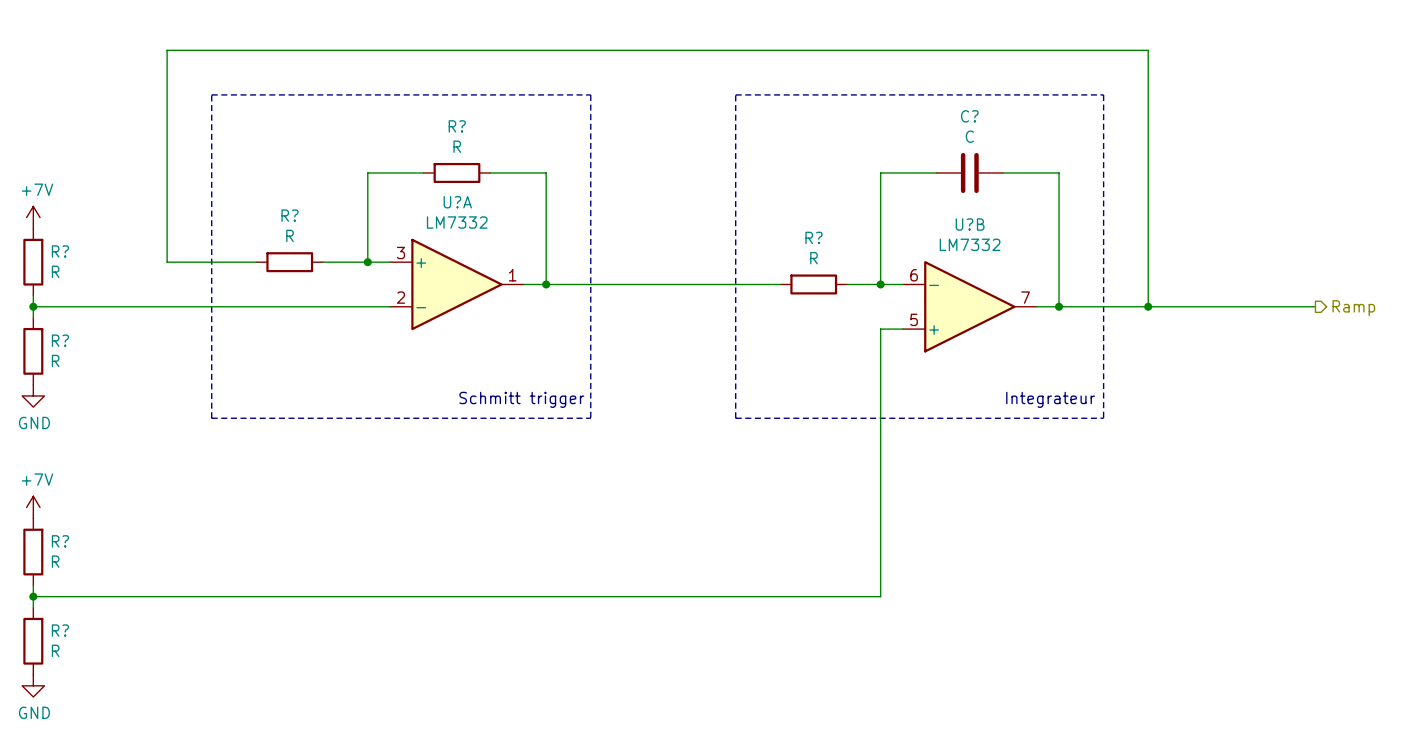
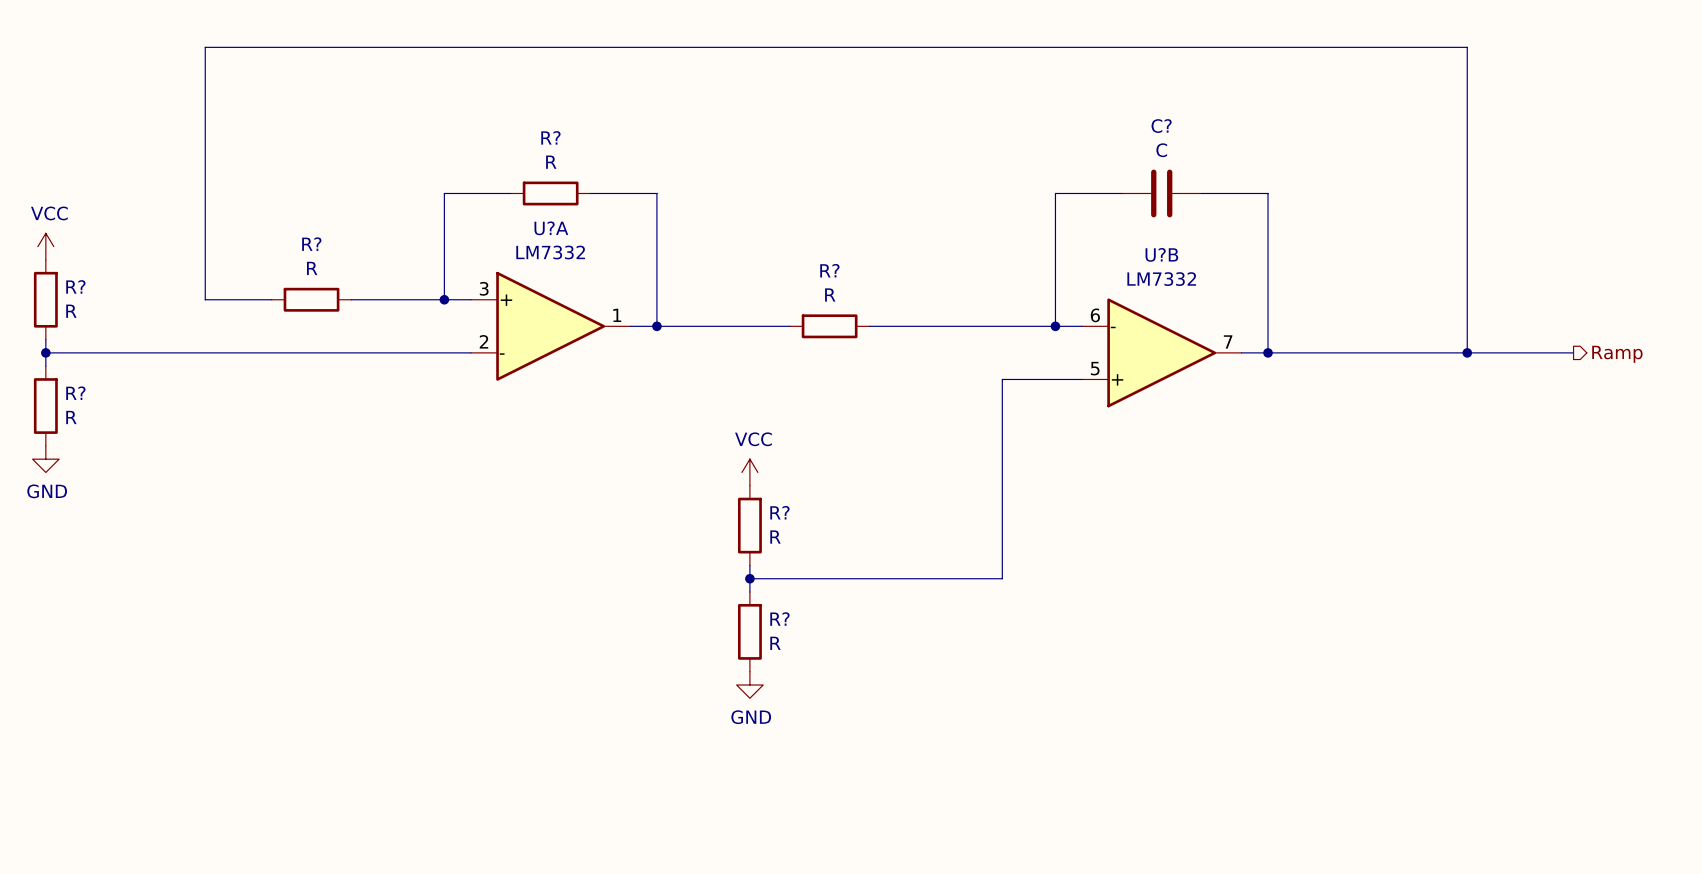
wire: (1148, 50) (1148, 306) -> (1374, 47) (1467, 47) (1467, 352)
line: (211, 94) (211, 418) (590, 418) (590, 94) (211, 94) -> none
line: (735, 94) (1103, 94) (1103, 418) (735, 418) (735, 94) -> none
power symbol: +7V (33, 217) -> VCC (45, 246)
wire: (222, 262) (256, 262) -> (351, 299) (391, 299)
R? position: (289, 262) -> (311, 299)
wire: (657, 284) (724, 284) -> (935, 326) (1015, 326)
R? position: (813, 284) -> (829, 326)
junction: (1148, 306) -> none
junction: none -> (1467, 352)
wire: (880, 329) (880, 596) (33, 596) -> (1055, 379) (1002, 379) (1002, 578) (749, 578)
text: Schmitt trigger (521, 399) -> none
text: Integrateur (1050, 399) -> none
power symbol: none -> VCC (749, 472)
R?: none -> R (749, 525)
wire: none -> (749, 565) (749, 592)
junction: none -> (749, 578)
power symbol: +7V (33, 507) -> none
R?: none -> R (749, 631)
R?: R (33, 552) -> none
wire: (33, 585) (33, 607) -> none
power symbol: none -> GND (749, 685)
junction: (33, 596) -> none
R?: R (33, 641) -> none
power symbol: GND (33, 685) -> none

